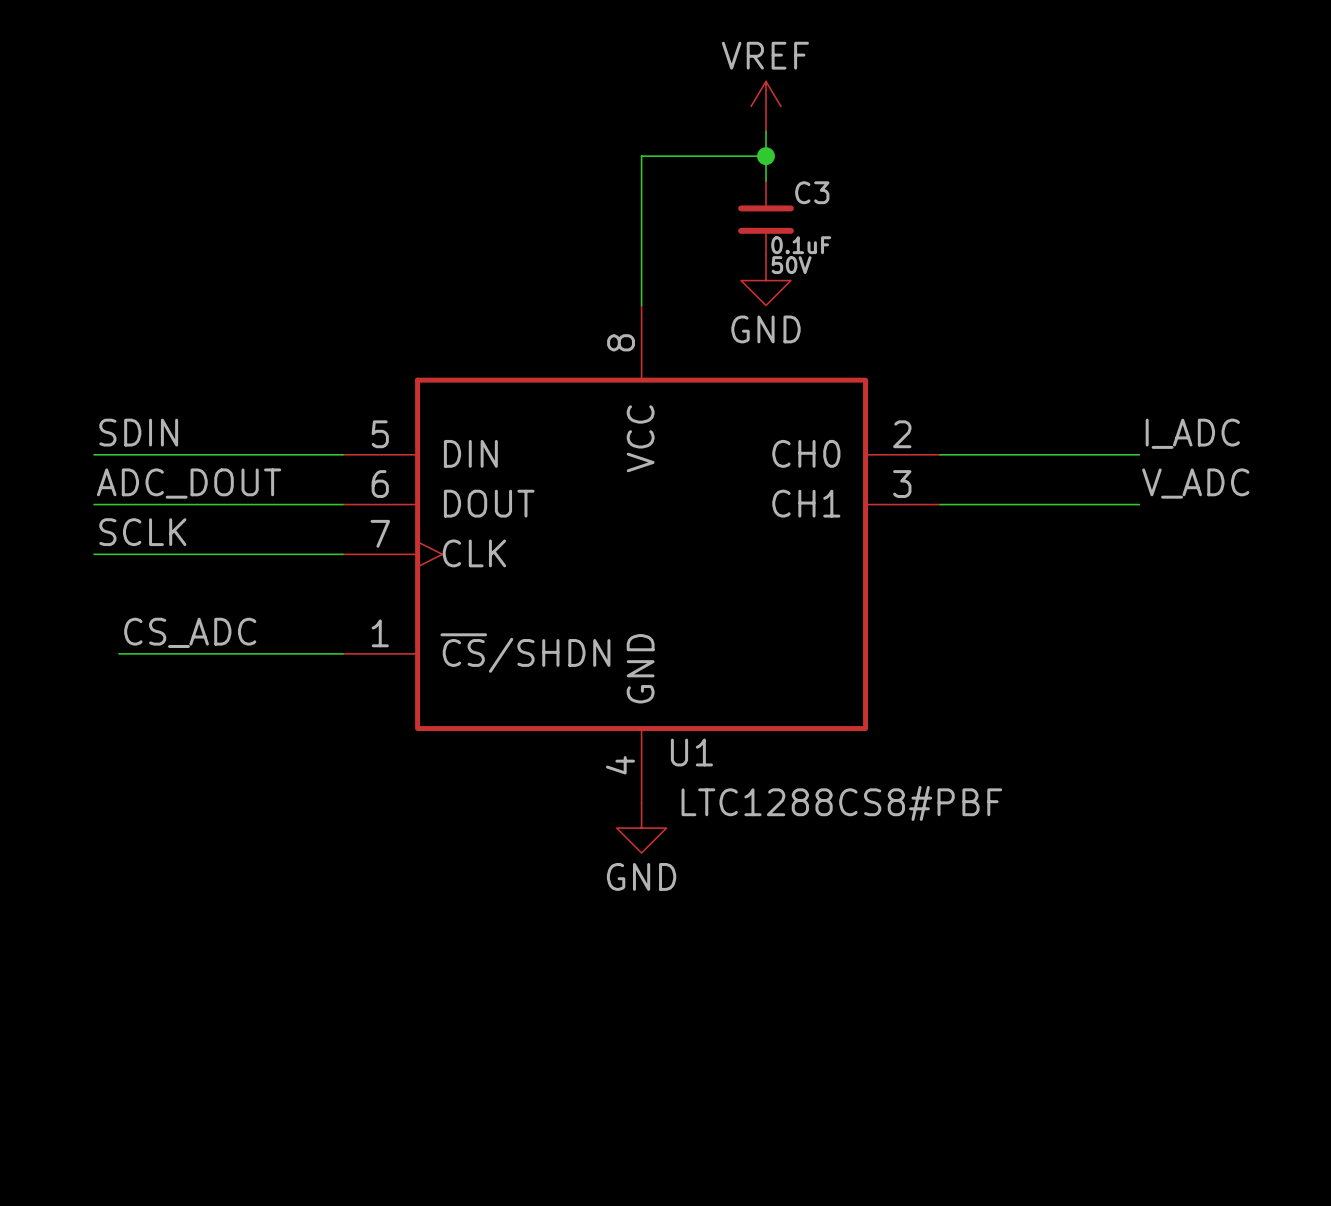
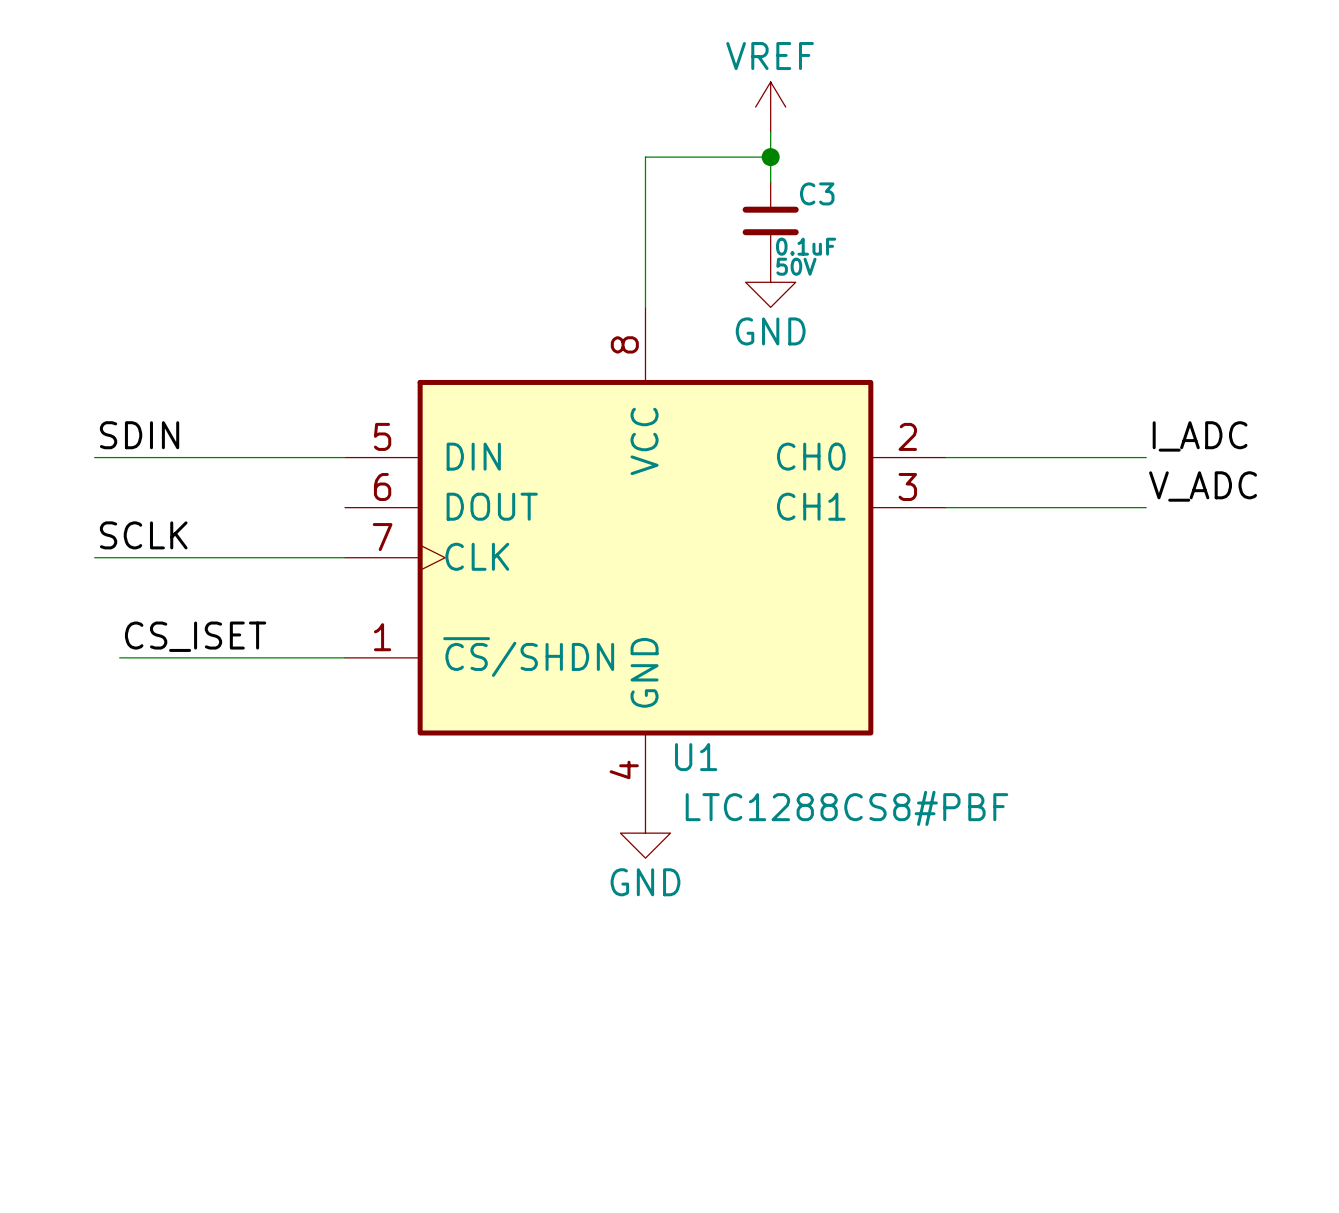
label: ADC_DOUT (189, 483) -> none
wire: (94, 504) (342, 504) -> none
label: CS_ADC (190, 632) -> CS_ISET (195, 636)

